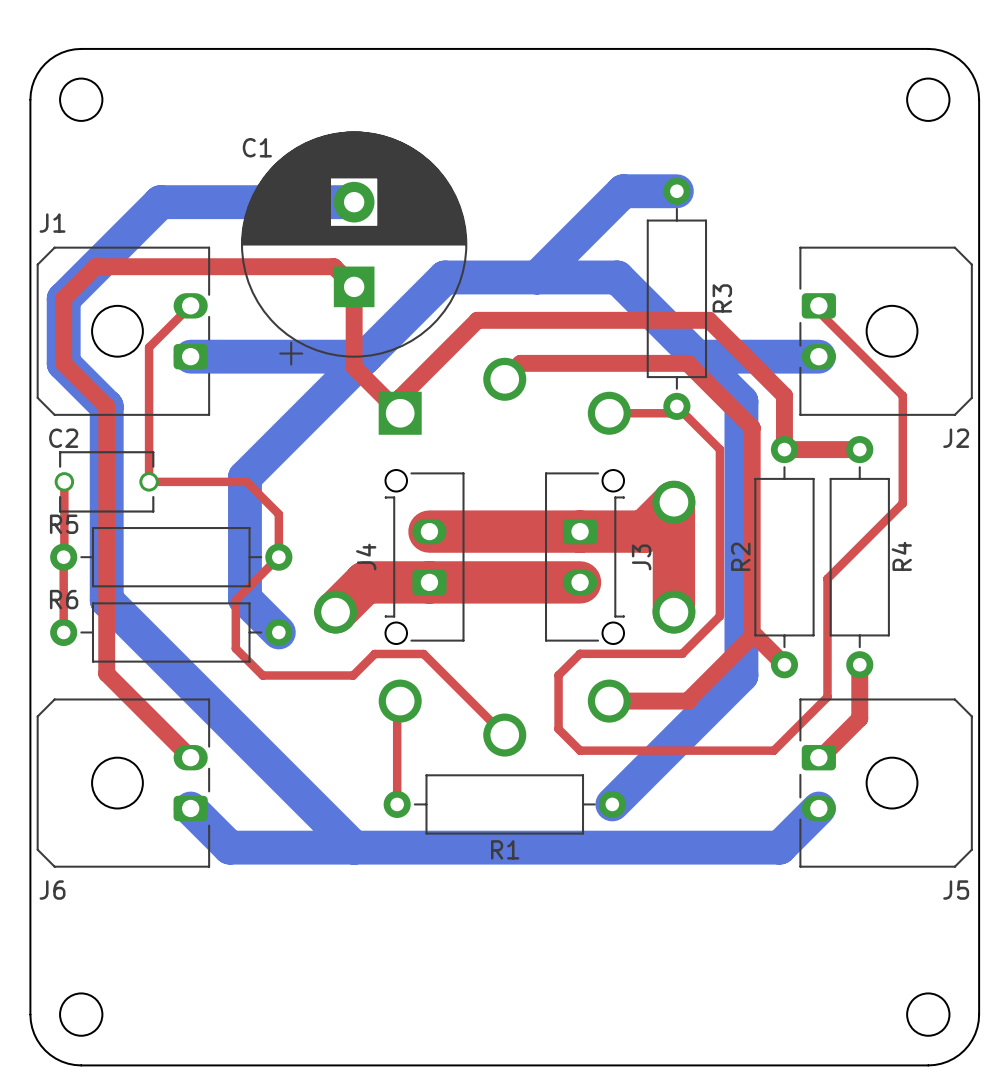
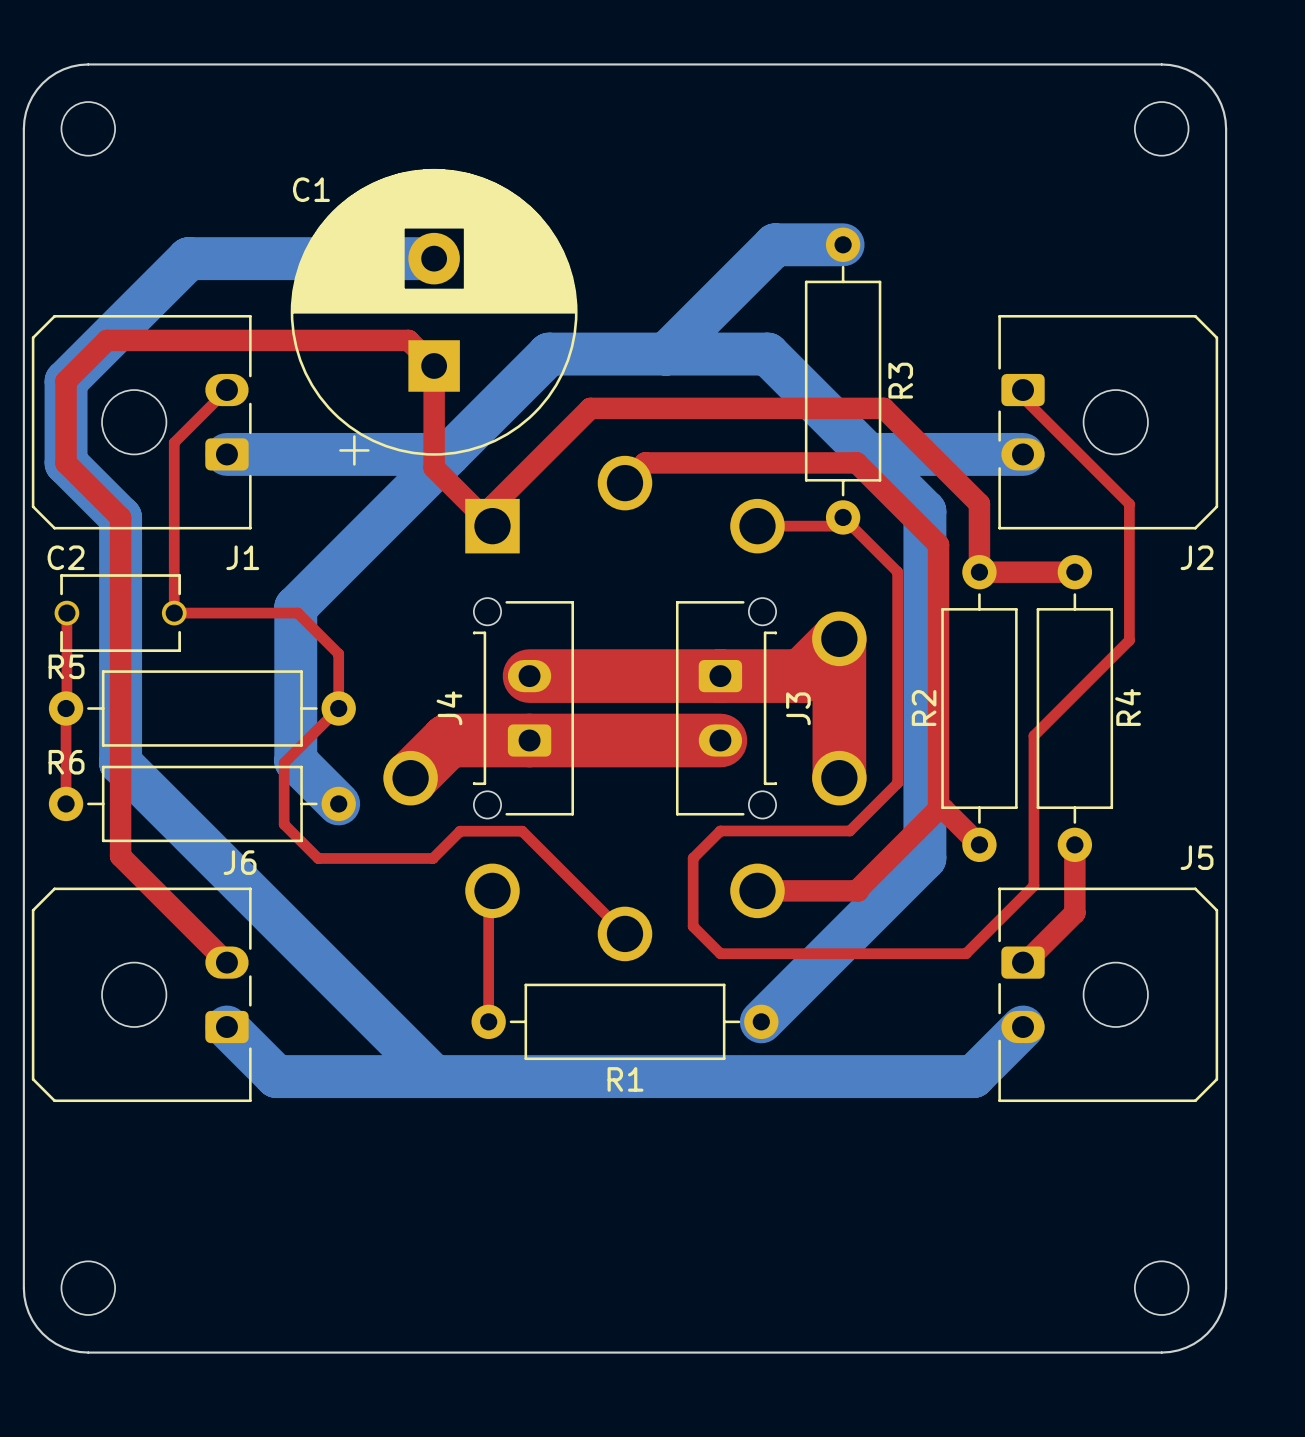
J1 name position: J1 (52, 223) -> J1 (242, 557)
J6 name position: J6 (52, 890) -> J6 (240, 862)
J5 name position: J5 (956, 890) -> J5 (1197, 857)

